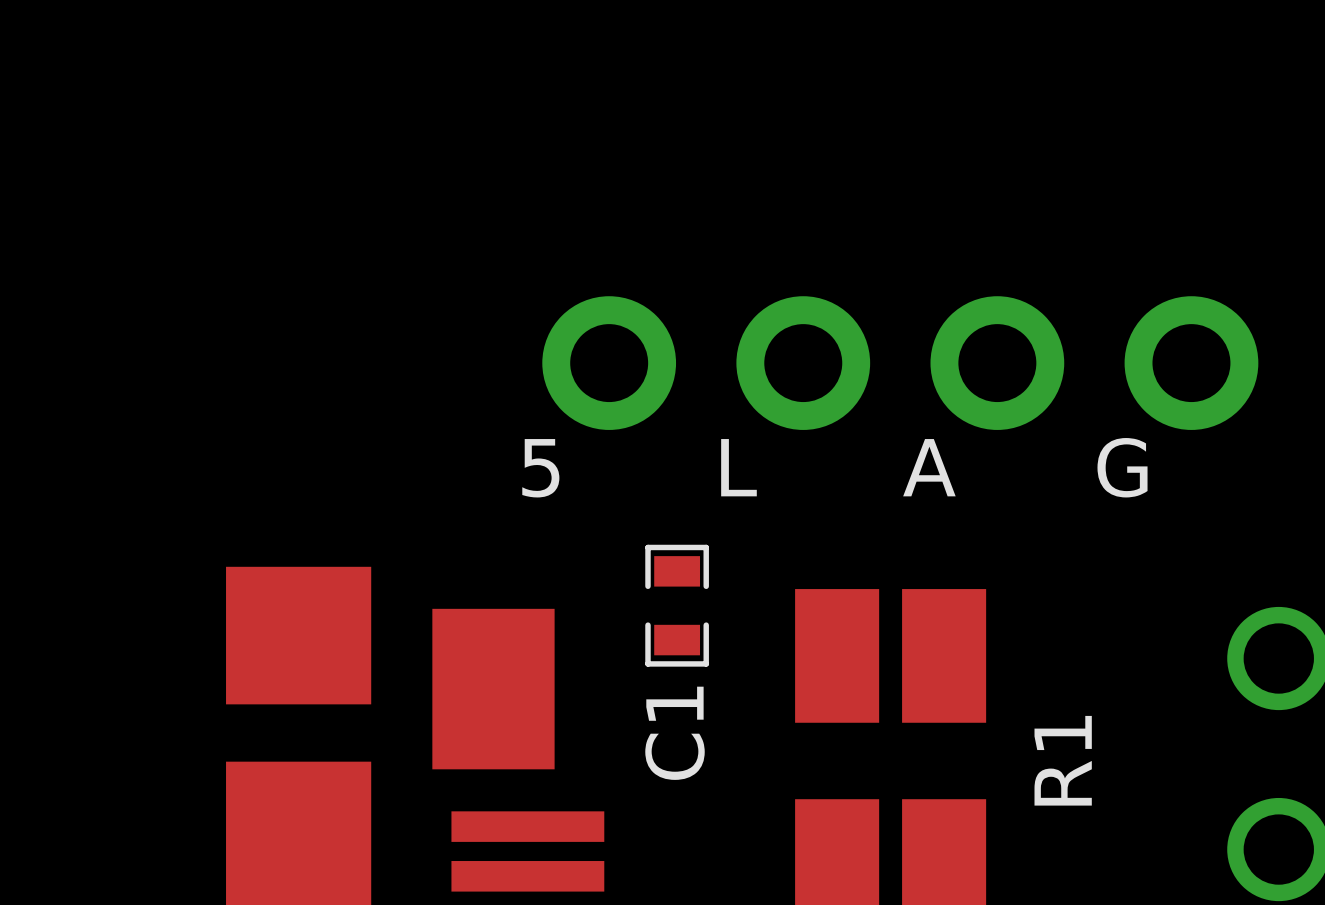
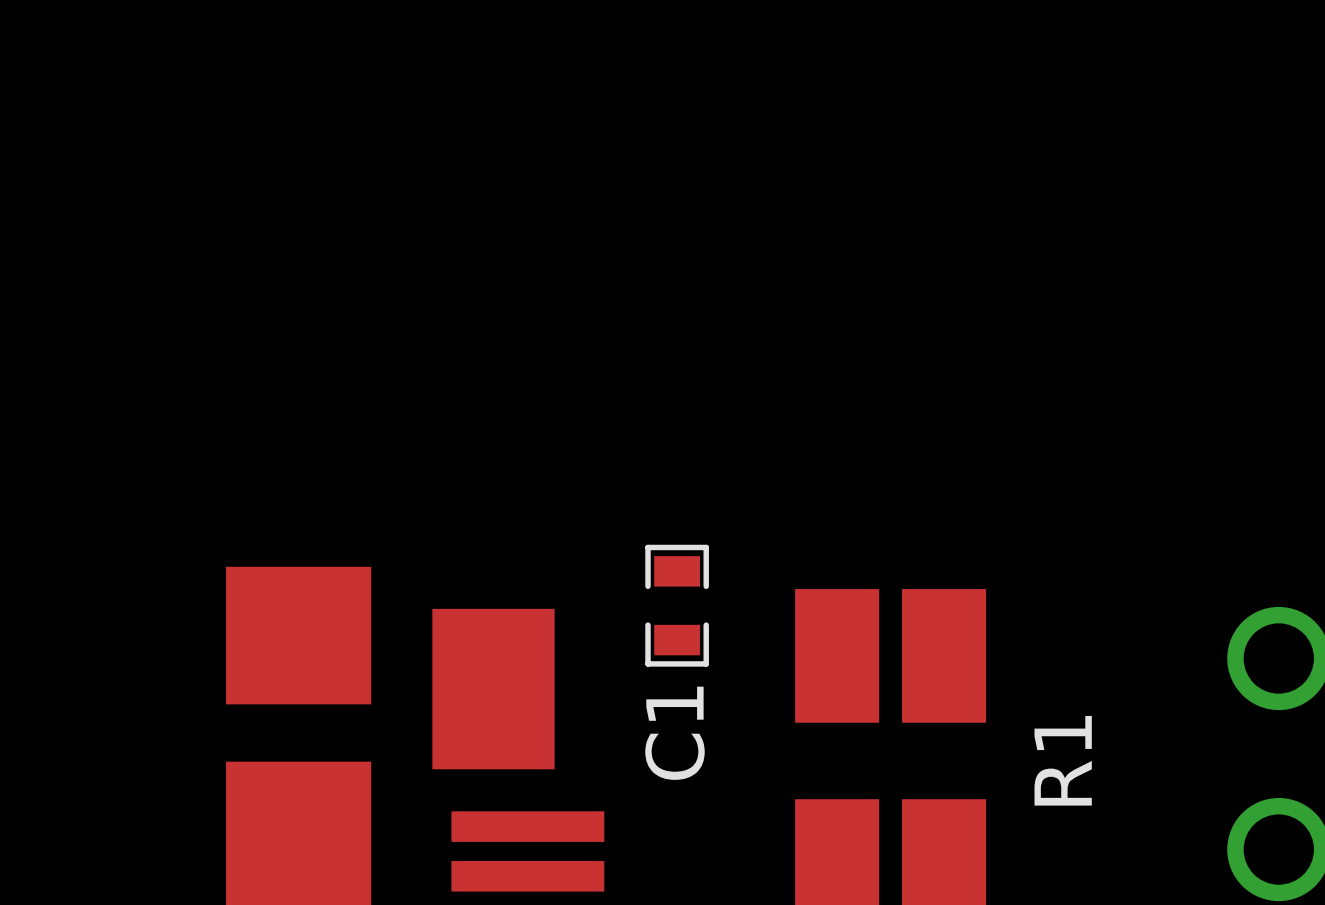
part: 5 (609, 363) -> none
part: L (803, 363) -> none
part: A (997, 363) -> none
part: G (1191, 363) -> none

